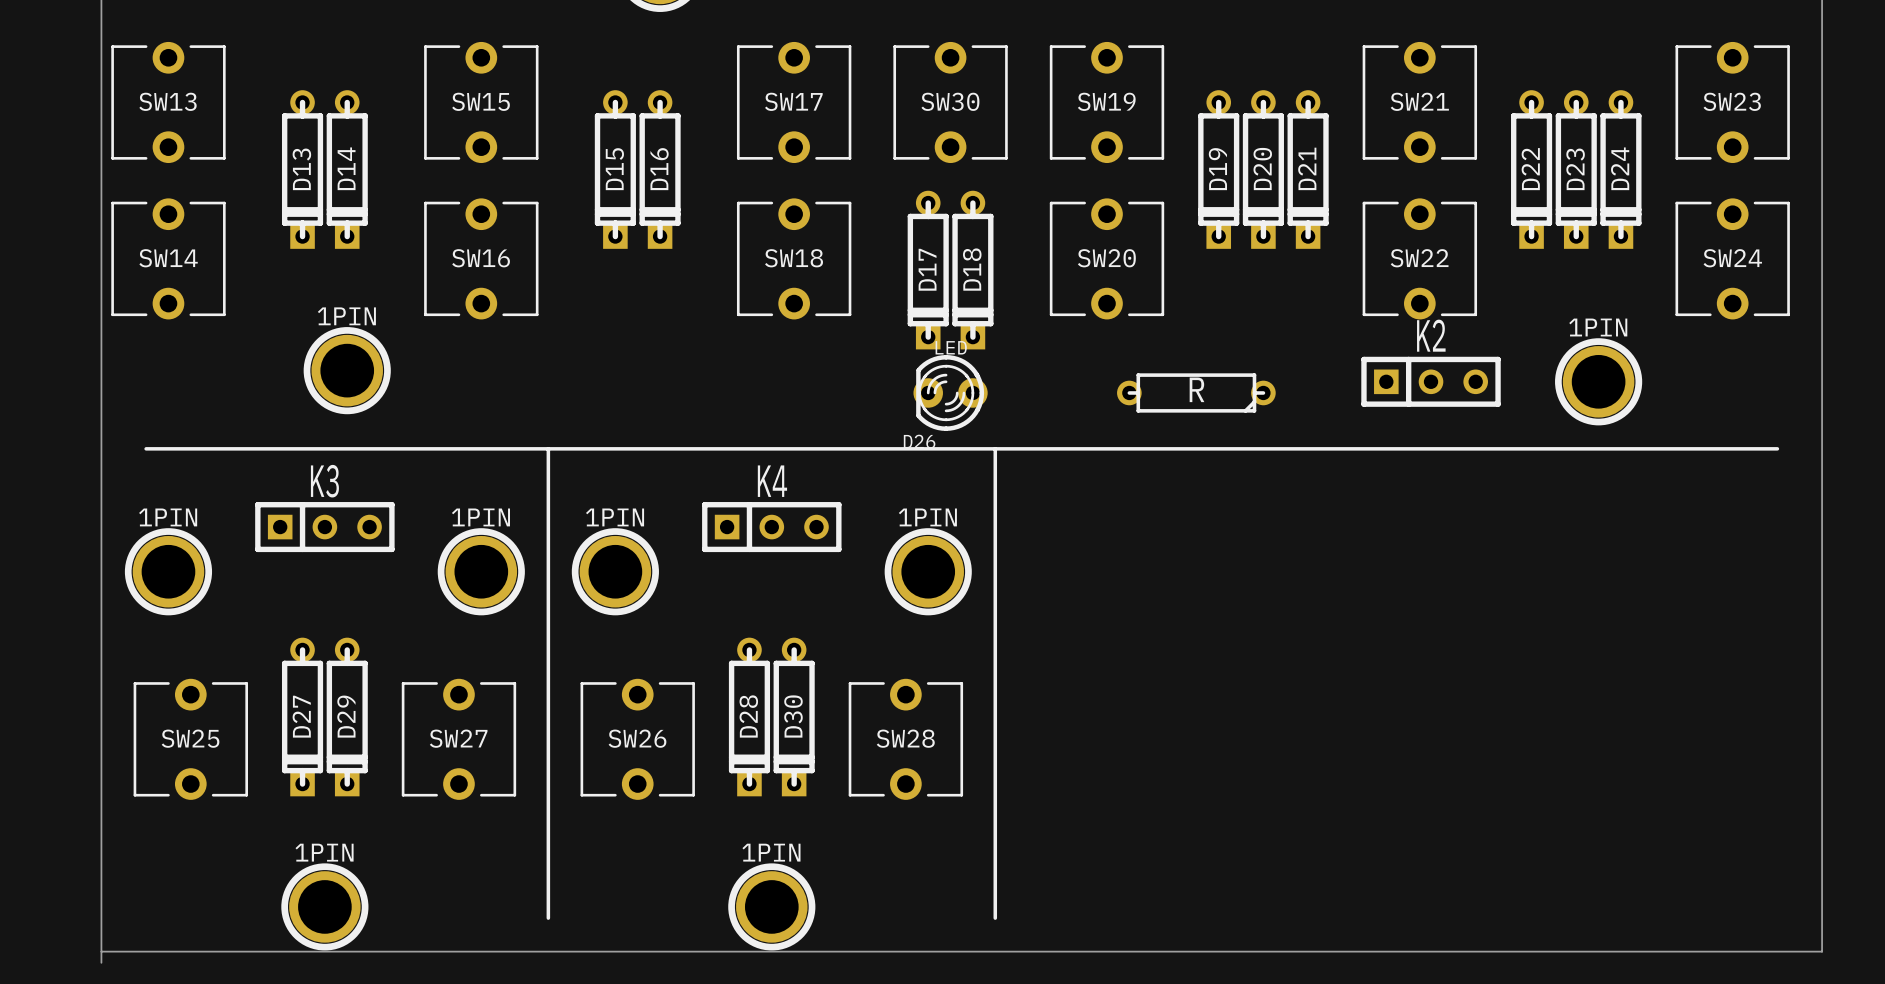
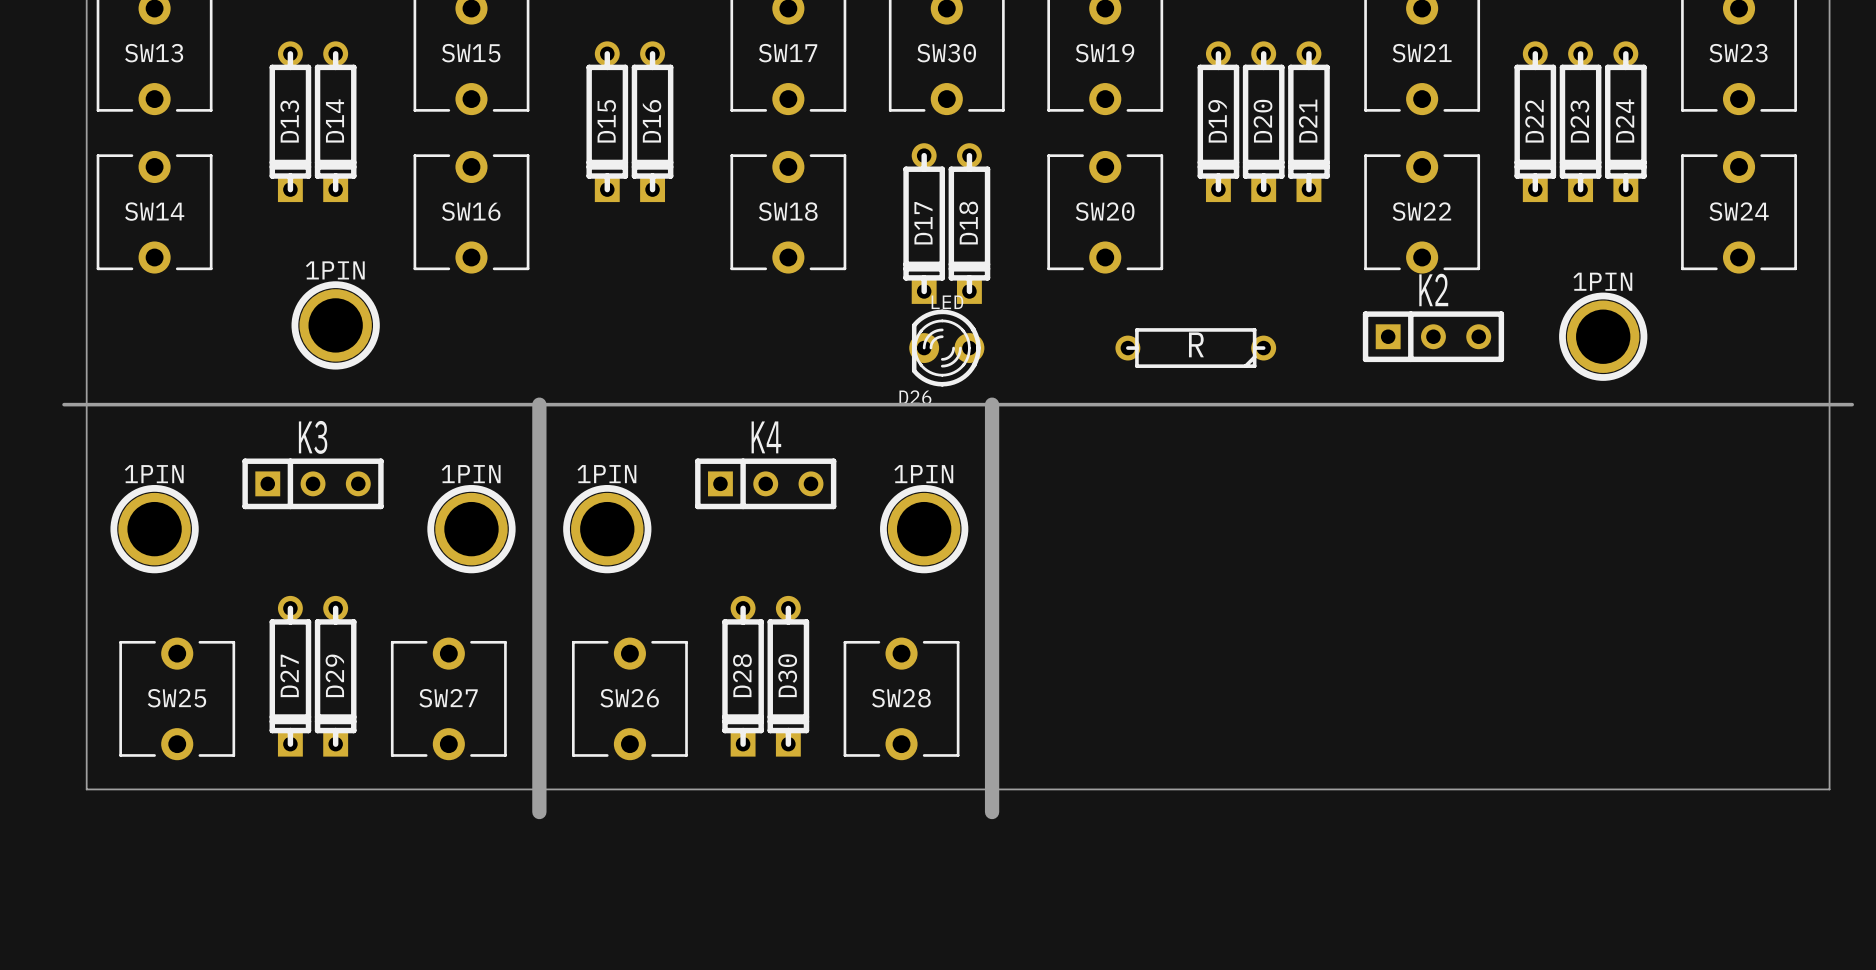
board edge: none -> (64, 404) (1852, 404)
line: (146, 448) (1777, 448) -> none
board edge: none -> (539, 404) (539, 812)
line: (548, 448) (548, 918) -> none
board edge: none -> (992, 404) (992, 812)
line: (995, 448) (995, 918) -> none
board edge: (101, 828) (101, 962) -> none
board edge: (1822, 828) (1822, 951) (101, 951) -> (1829, 789) (86, 789)
1PIN: (324, 906) -> none
1PIN: (771, 906) -> none

